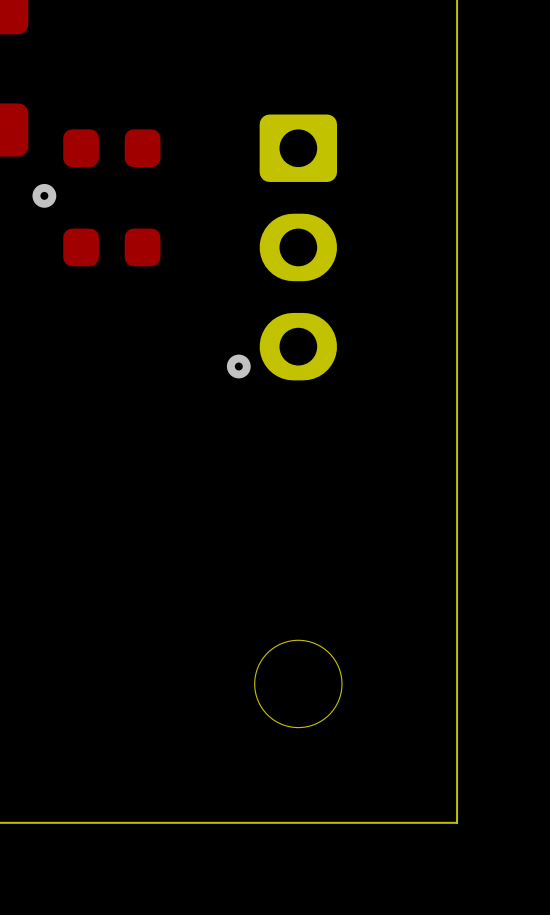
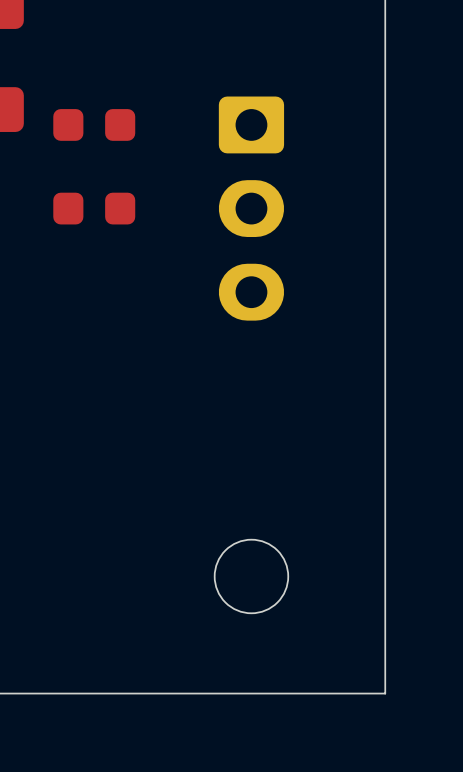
via: (44, 195) -> none
via: (238, 366) -> none

